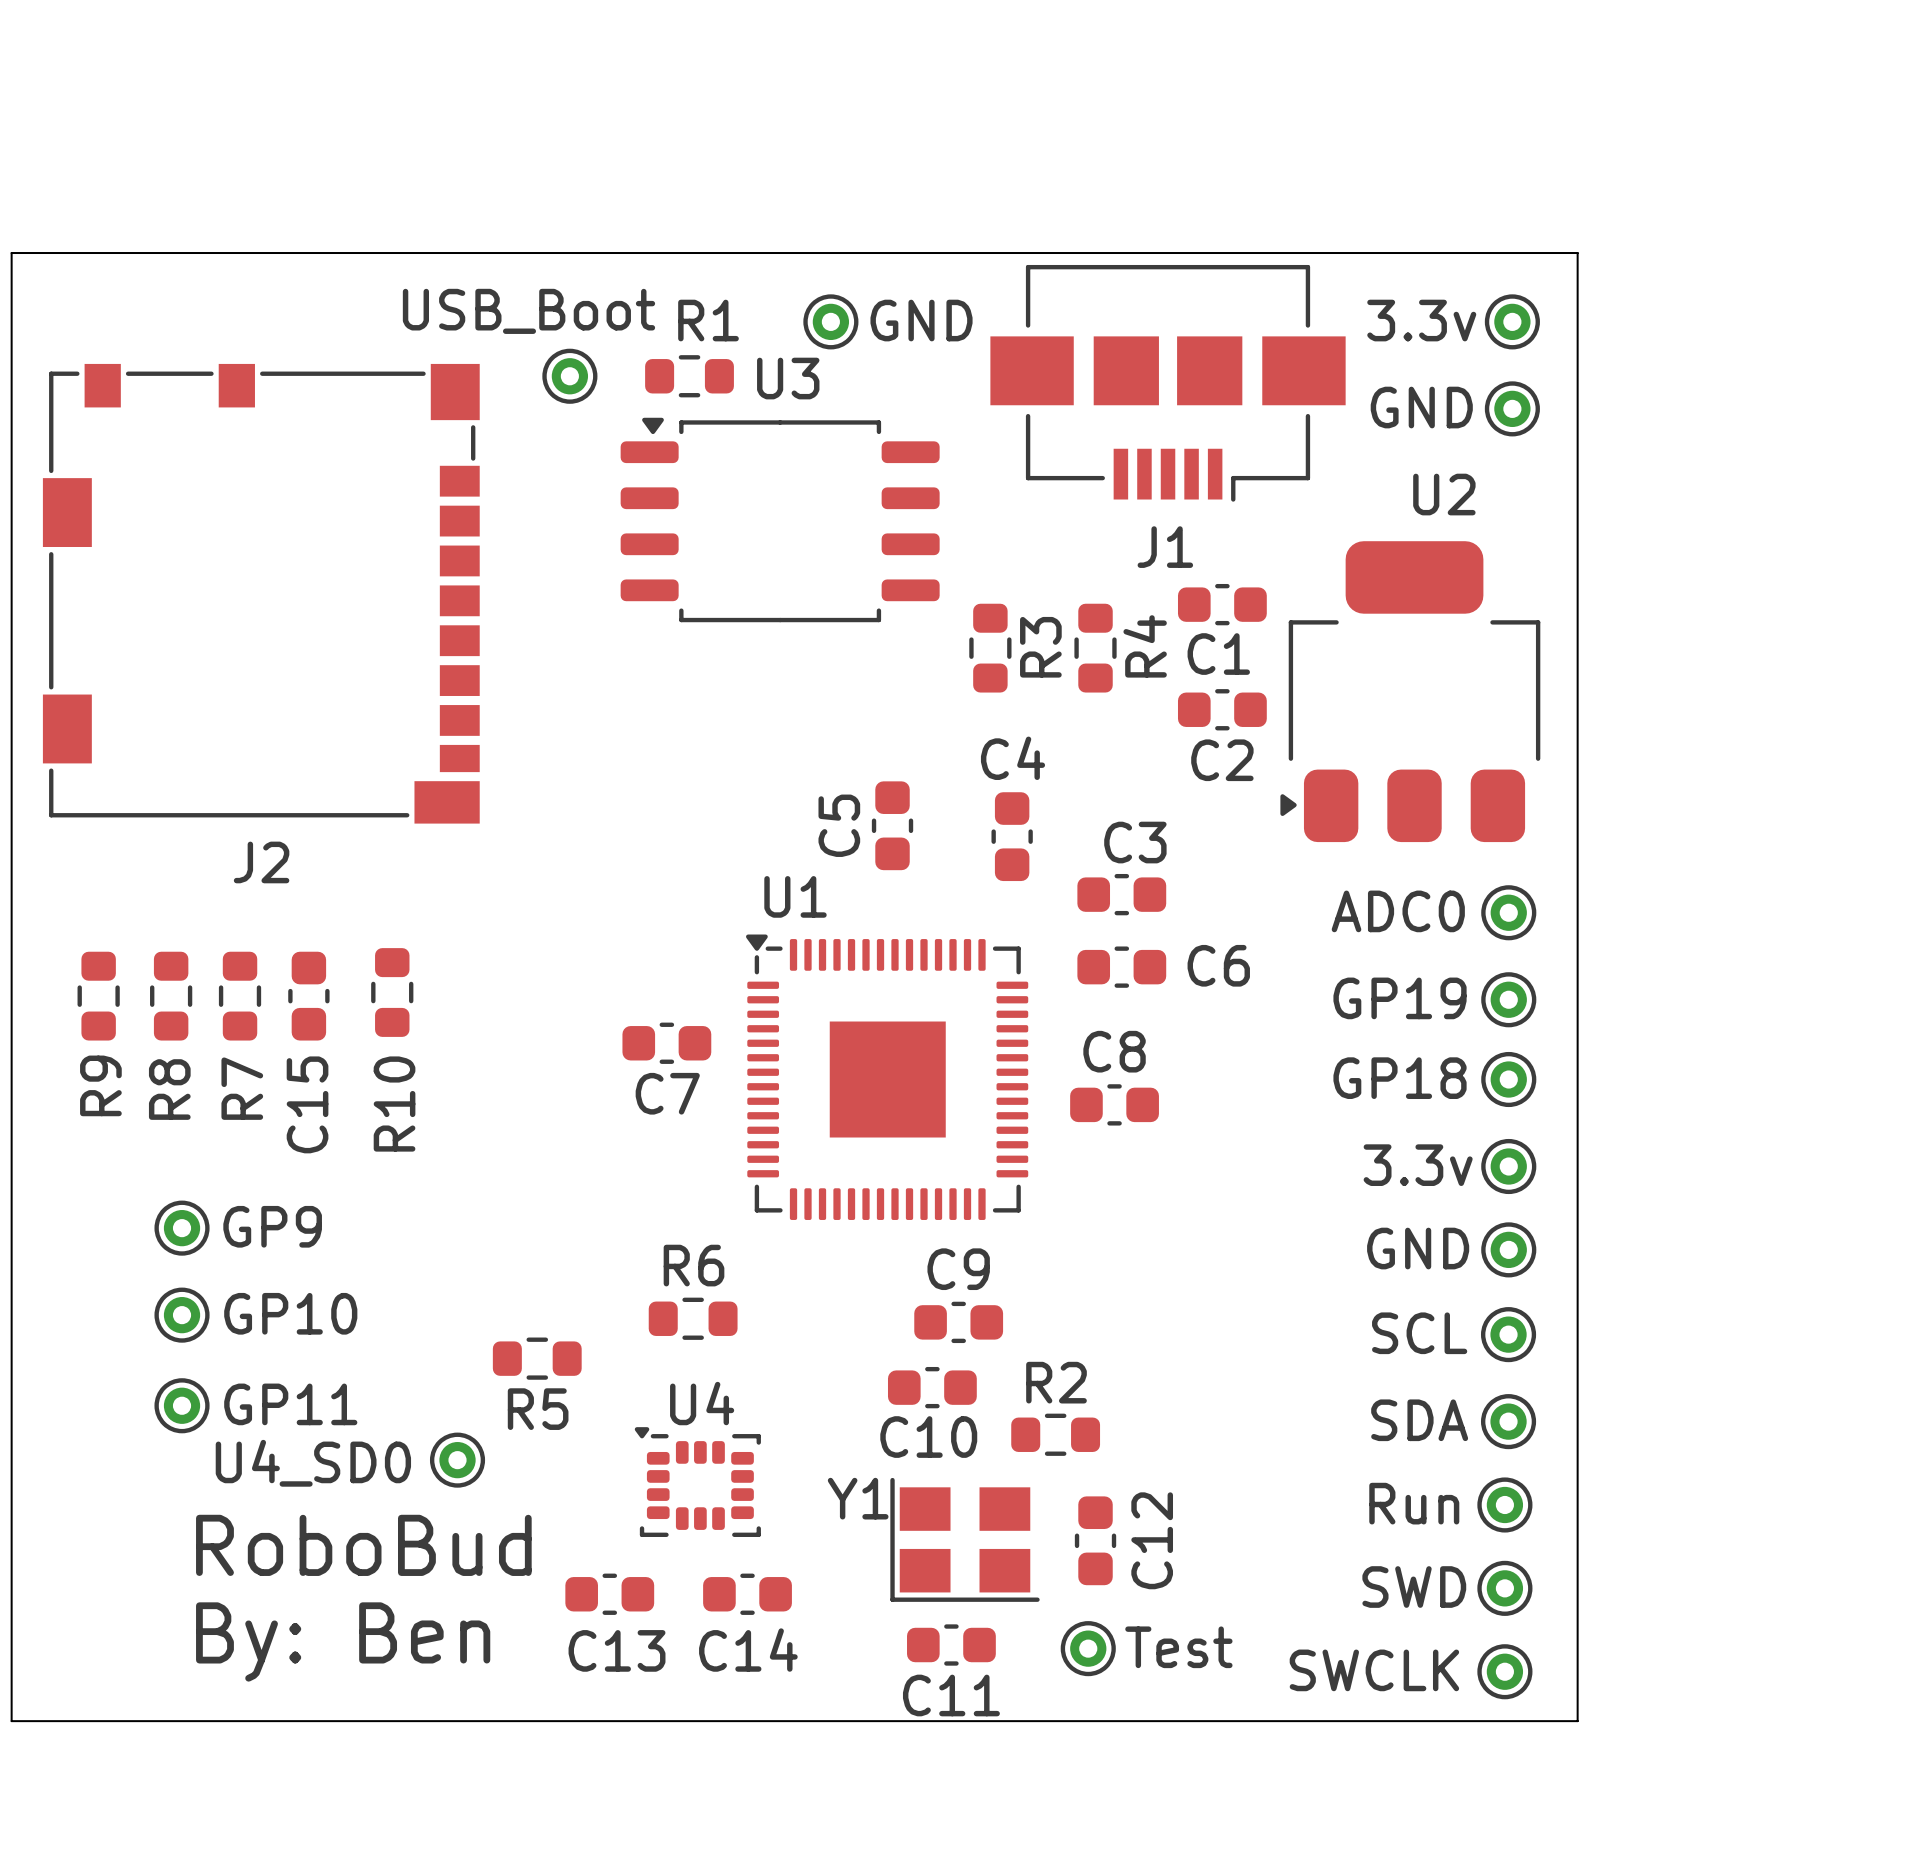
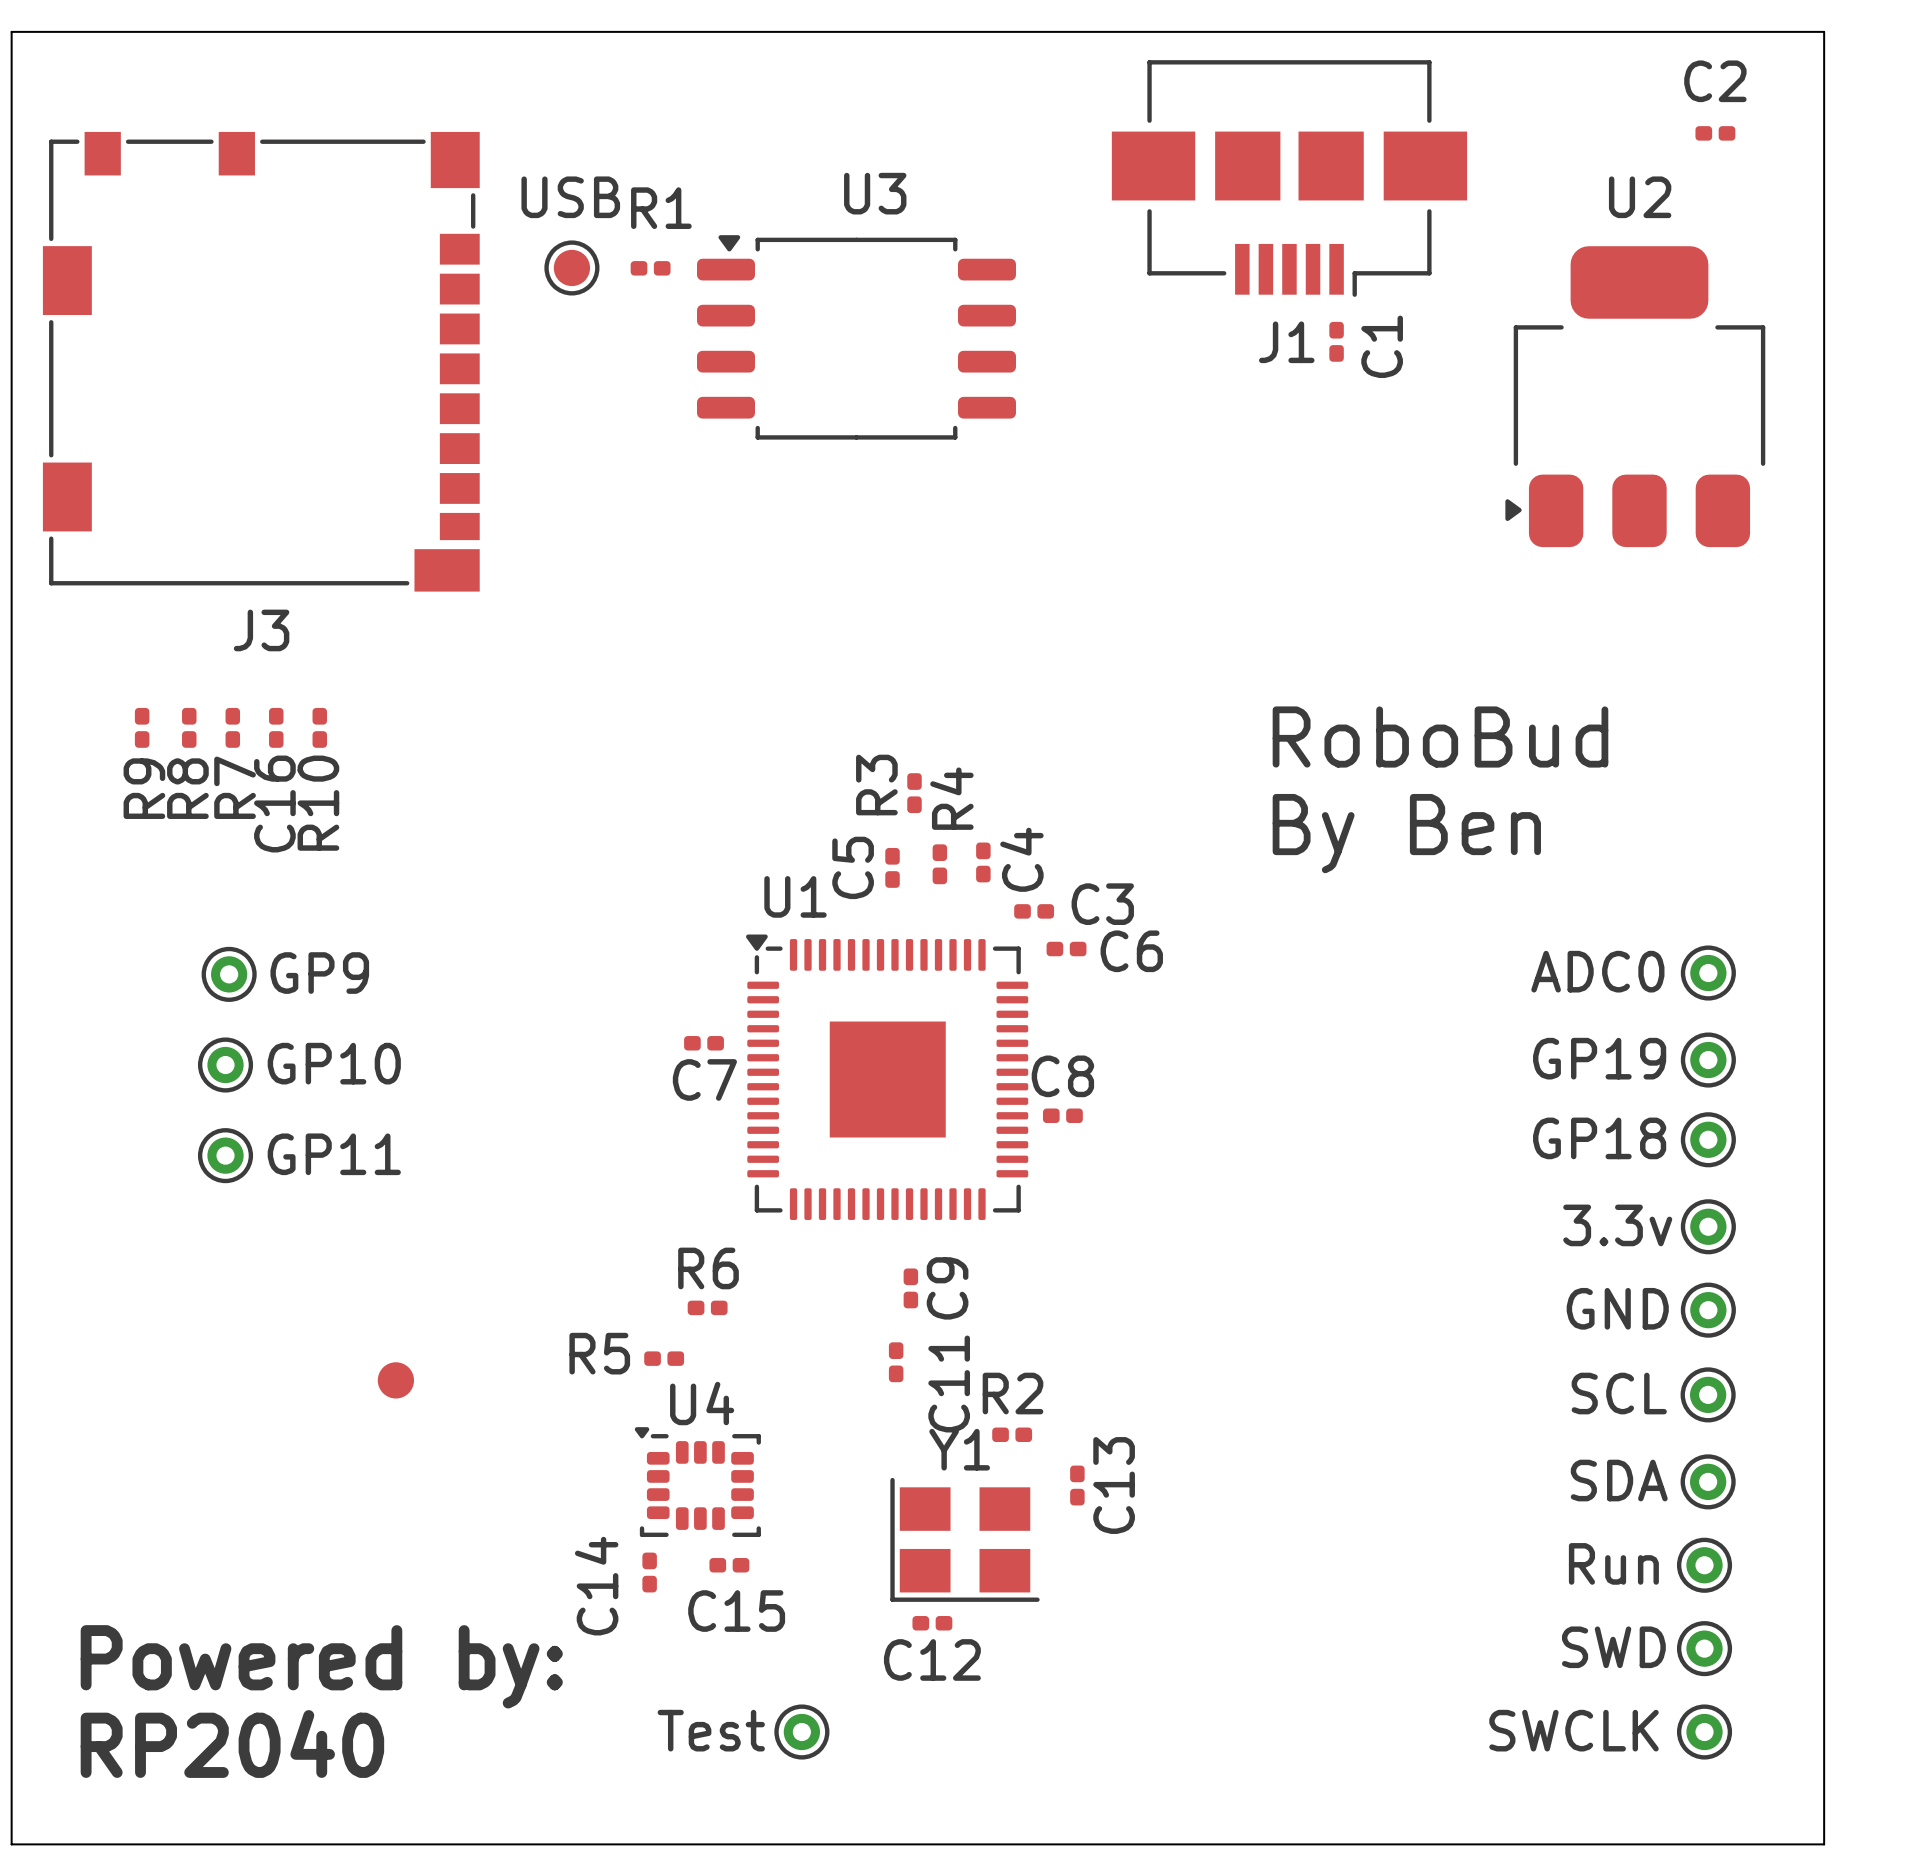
board edge: (11, 253) (1577, 253) (1577, 1721) (11, 1721) -> (11, 253) (11, 31) (1824, 31) (1824, 1844) (11, 1844) (11, 1721)
USB: none -> (571, 267)
GND: (830, 321) -> none
3.3v: (1512, 321) -> none
R1 footprint: [645, 355, 734, 398] -> [630, 261, 671, 276]
J3: none -> (261, 361)
USB_Boot: (569, 376) -> none
U3 name position: U3 (788, 378) -> U3 (875, 193)
J1 position: (1168, 383) -> (1289, 178)
GND: (1512, 408) -> none
U2 name position: U2 (1444, 494) -> U2 (1640, 197)
U3 position: (780, 519) -> (856, 337)
C1 footprint: [1177, 583, 1267, 626] -> [1329, 321, 1344, 362]
J2: (261, 593) -> none
R3 footprint: [969, 603, 1012, 693] -> [907, 773, 922, 814]
R4 footprint: [1074, 603, 1117, 693] -> [932, 844, 948, 885]
R4 name position: R4 (1145, 646) -> R4 (951, 798)
R3 name position: R3 (1040, 647) -> R3 (876, 785)
C2 footprint: [1177, 689, 1267, 731] -> [1695, 126, 1736, 141]
U2 position: (1410, 691) -> (1635, 396)
C16: none -> (276, 727)
text: none -> RoboBud (1440, 737)
C4 name position: C4 (1013, 758) -> C4 (1021, 859)
C2 name position: C2 (1222, 760) -> C2 (1715, 81)
C5 footprint: [871, 781, 914, 871] -> [885, 847, 900, 888]
C4 footprint: [991, 792, 1033, 882] -> [976, 842, 991, 883]
text: none -> By Ben (1406, 833)
C3 footprint: [1077, 873, 1167, 916] -> [1014, 904, 1055, 919]
ADC0 position: (1508, 912) -> (1708, 973)
C6 footprint: [1077, 946, 1167, 988] -> [1046, 941, 1087, 957]
R10 footprint: [371, 948, 414, 1037] -> [312, 707, 328, 748]
R9 footprint: [77, 951, 120, 1041] -> [134, 707, 150, 748]
R8 footprint: [150, 951, 193, 1041] -> [182, 707, 197, 748]
R7 footprint: [218, 951, 262, 1041] -> [225, 707, 241, 748]
C15 footprint: [288, 951, 330, 1041] -> [709, 1558, 750, 1573]
GP19 position: (1508, 999) -> (1708, 1060)
C7 footprint: [622, 1022, 712, 1064] -> [684, 1036, 724, 1051]
GP18 position: (1508, 1079) -> (1708, 1139)
C8 footprint: [1070, 1084, 1159, 1126] -> [1042, 1108, 1083, 1124]
3.3v position: (1508, 1166) -> (1708, 1226)
GP9 position: (182, 1228) -> (229, 974)
GND position: (1508, 1249) -> (1708, 1310)
R6 footprint: [648, 1297, 738, 1340] -> [687, 1300, 728, 1316]
C9 footprint: [914, 1301, 1004, 1344] -> [903, 1268, 919, 1309]
GP10 position: (182, 1315) -> (225, 1065)
SCL position: (1508, 1334) -> (1708, 1394)
R5 footprint: [492, 1337, 582, 1380] -> [644, 1351, 685, 1366]
part: none -> (395, 1380)
C10: (932, 1387) -> none
GP11 position: (182, 1405) -> (225, 1155)
R5 name position: R5 (538, 1409) -> R5 (599, 1353)
R2 footprint: [1011, 1413, 1101, 1456] -> [992, 1427, 1033, 1443]
SDA position: (1508, 1421) -> (1708, 1481)
U4_SD0: (457, 1460) -> none
C12 footprint: [1074, 1496, 1117, 1586] -> [912, 1616, 953, 1631]
Y1 name position: Y1 (858, 1498) -> Y1 (959, 1449)
Run position: (1504, 1504) -> (1704, 1565)
text: RoboBud (363, 1545) -> none
C13 footprint: [565, 1573, 655, 1615] -> [1070, 1465, 1085, 1506]
C14 footprint: [703, 1573, 792, 1615] -> [642, 1552, 657, 1593]
SWD position: (1504, 1588) -> (1704, 1648)
C11 footprint: [907, 1624, 996, 1666] -> [888, 1342, 904, 1383]
text: By: Ben (343, 1641) -> none
Test name position: Test (1178, 1647) -> Test (711, 1730)
Test position: (1088, 1648) -> (801, 1732)
text: none -> Powered by: (321, 1666)
SWCLK position: (1504, 1671) -> (1704, 1732)
text: none -> RP2040 (232, 1744)

